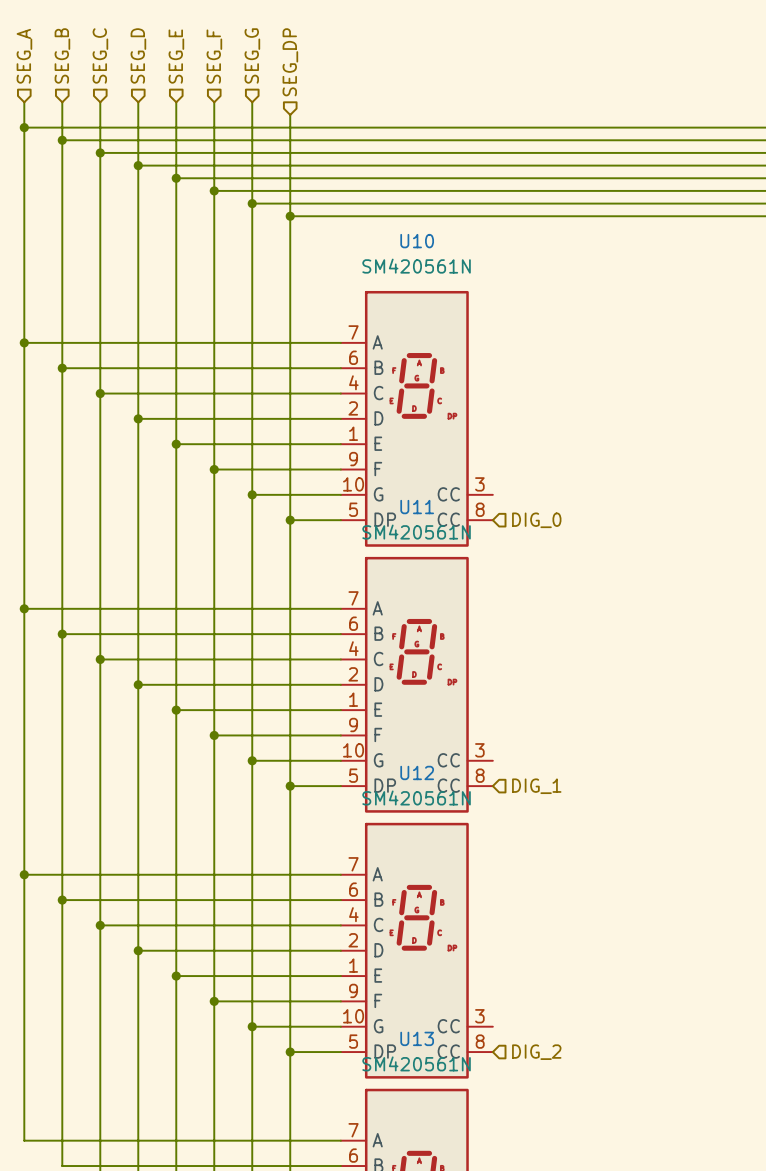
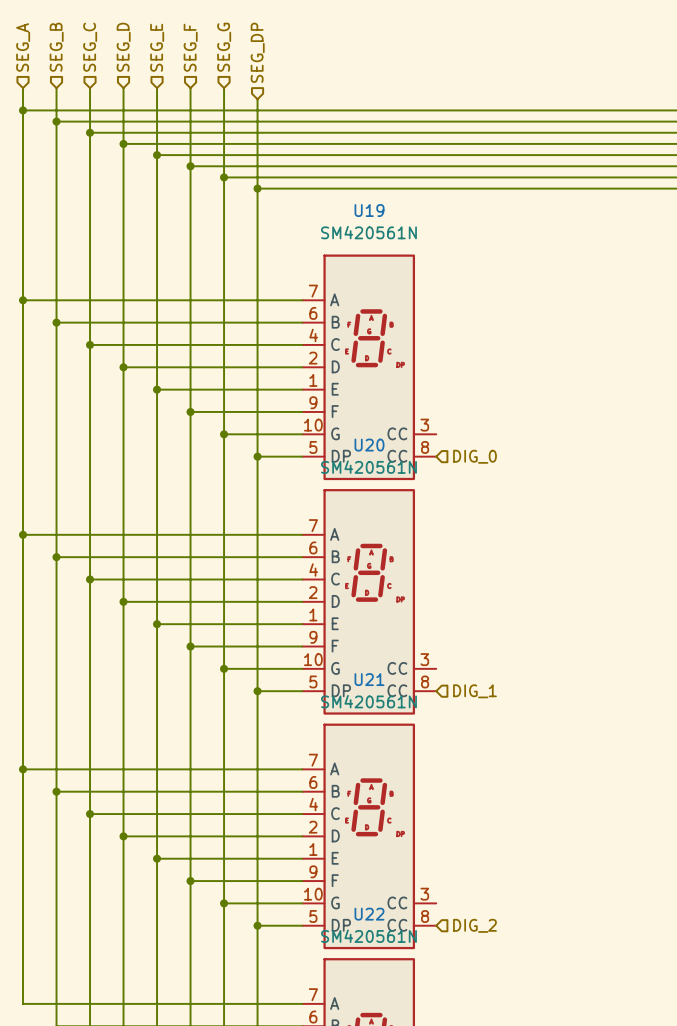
U10 name: U10 (417, 241) -> U19 (369, 210)
U11 name: U11 (417, 507) -> U20 (369, 445)
U12 name: U12 (417, 772) -> U21 (369, 679)
U13 name: U13 (417, 1038) -> U22 (369, 914)

